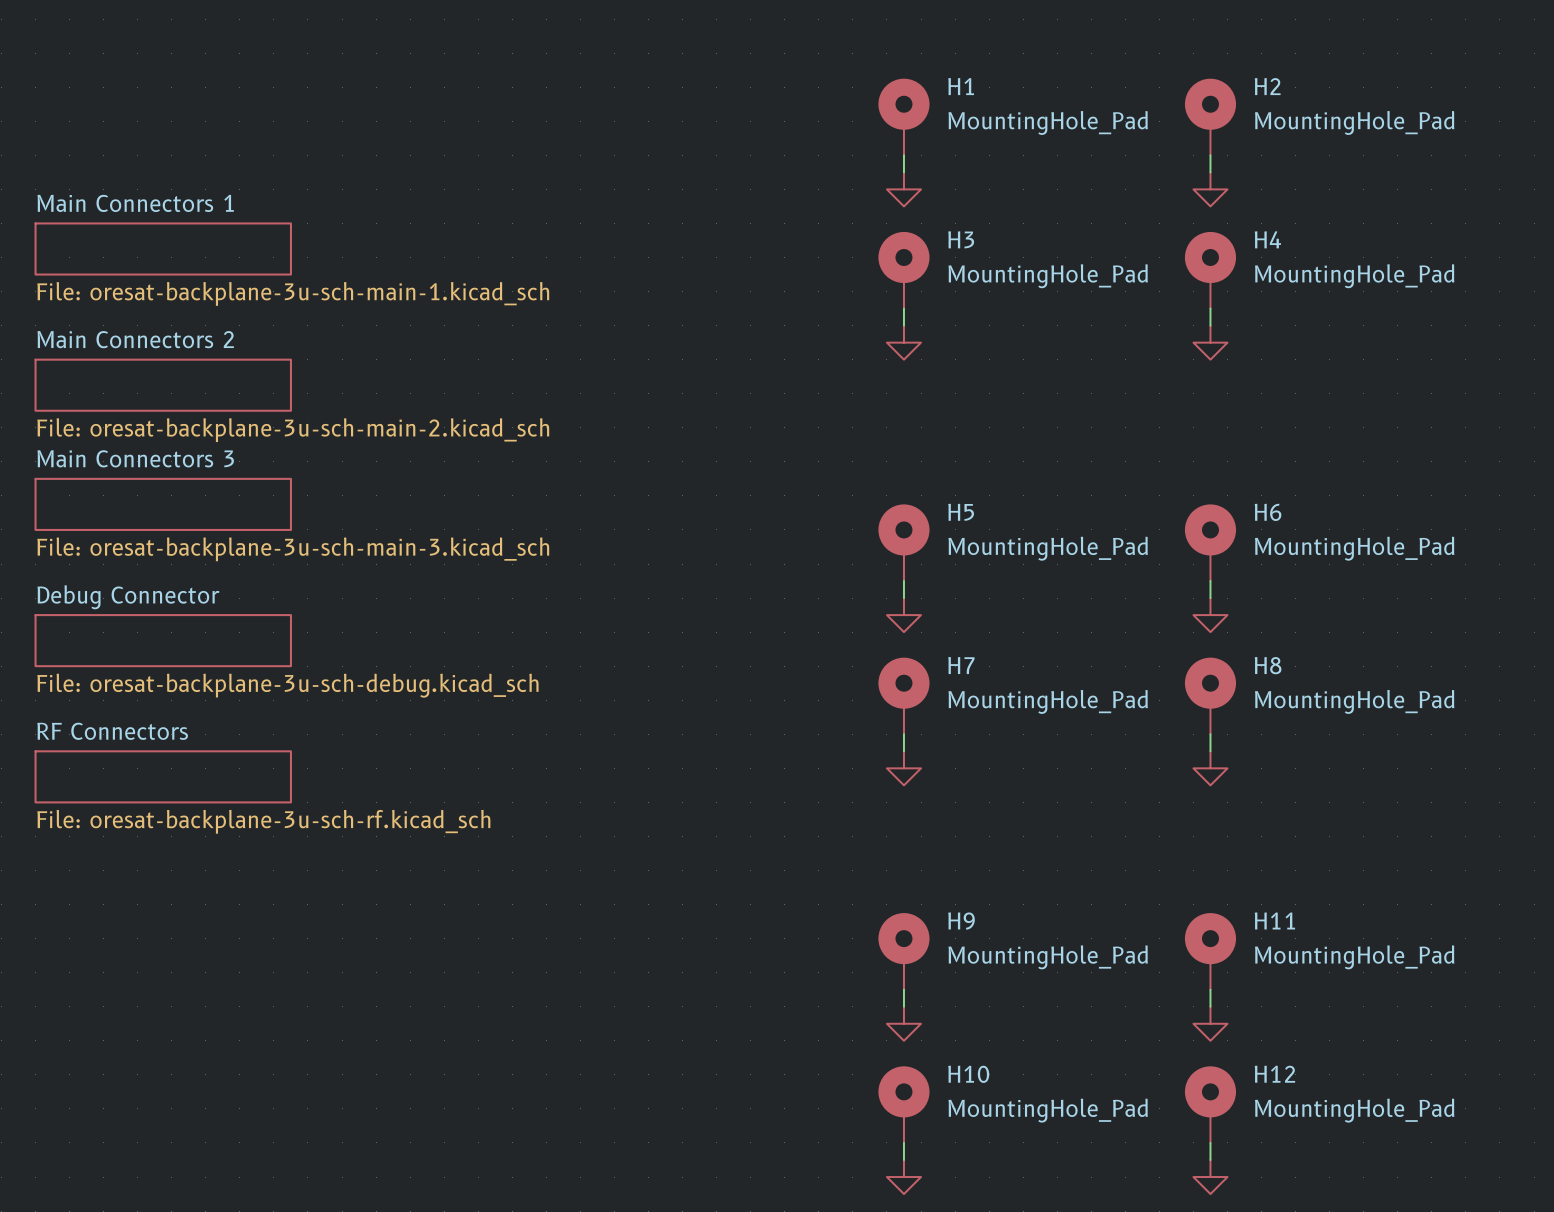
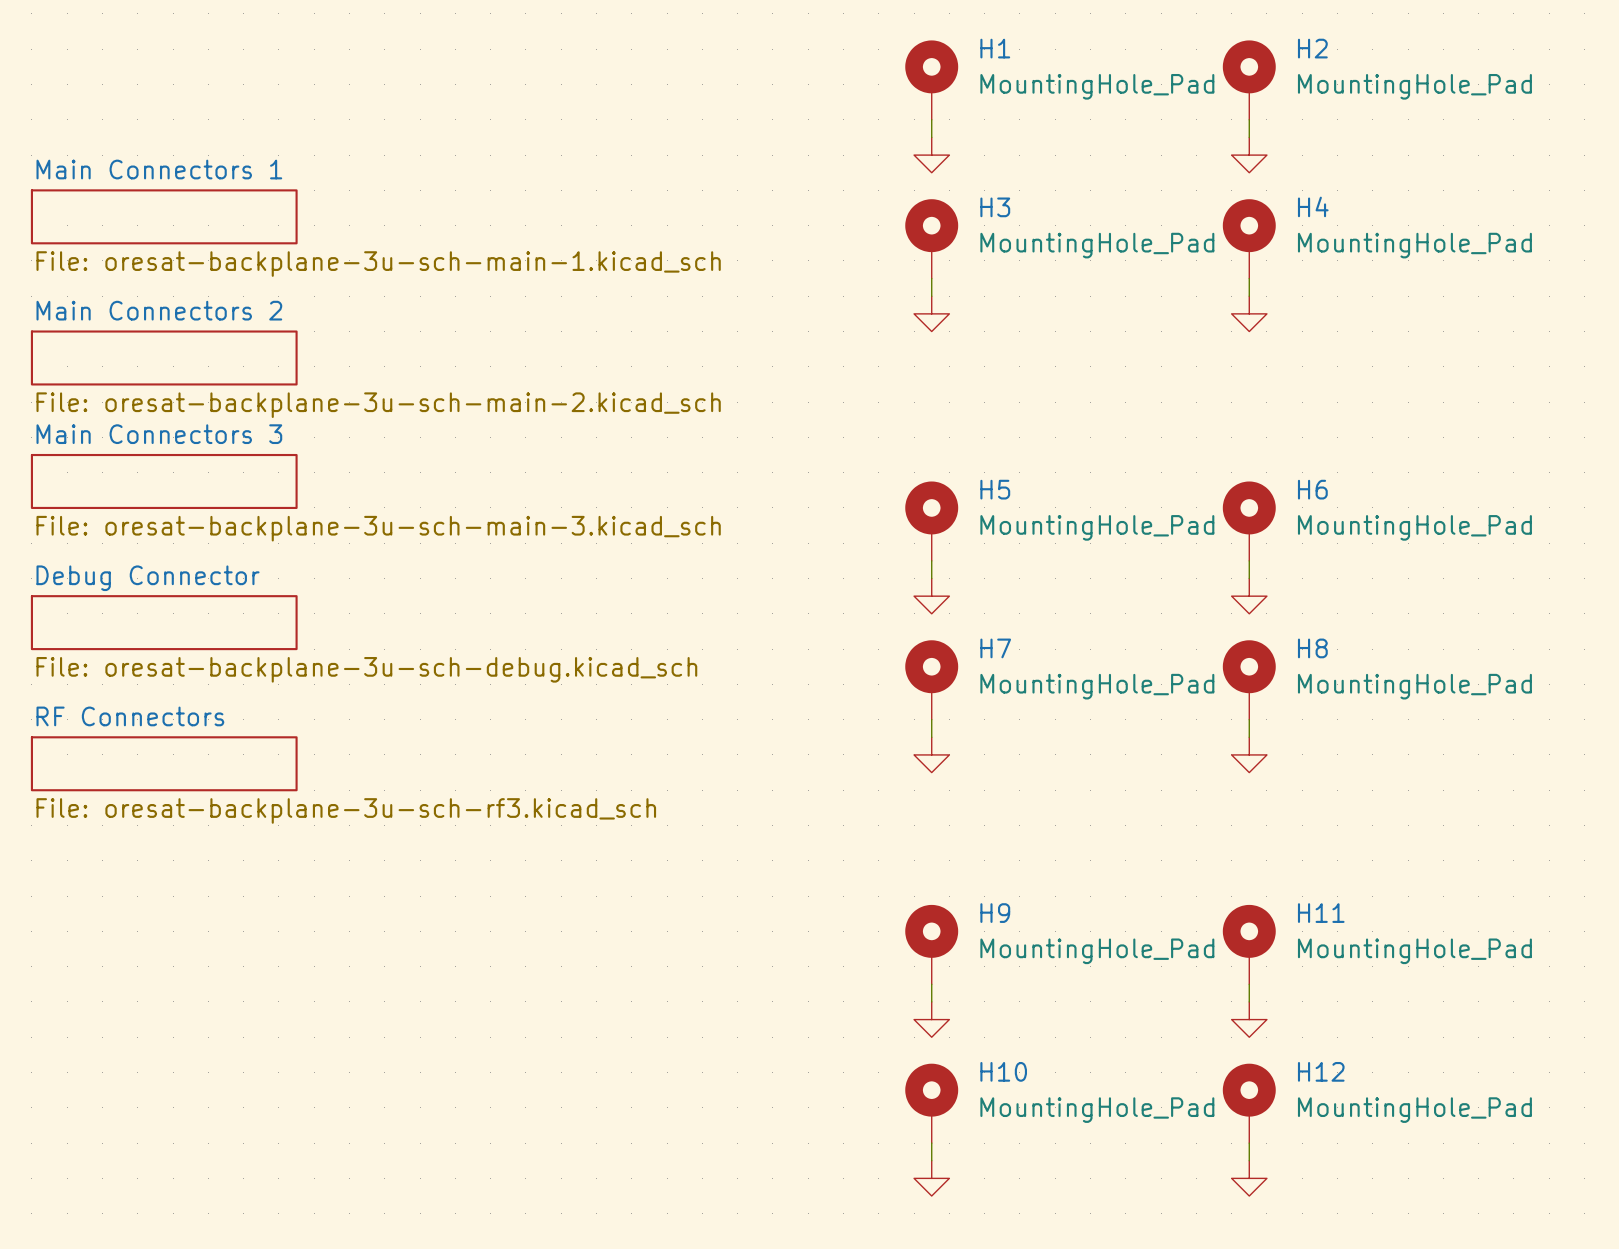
sheet RF Connectors value: File: oresat-backplane-3u-sch-rf.kicad_sch (263, 821) -> File: oresat-backplane-3u-sch-rf3.kicad_sch (346, 810)

